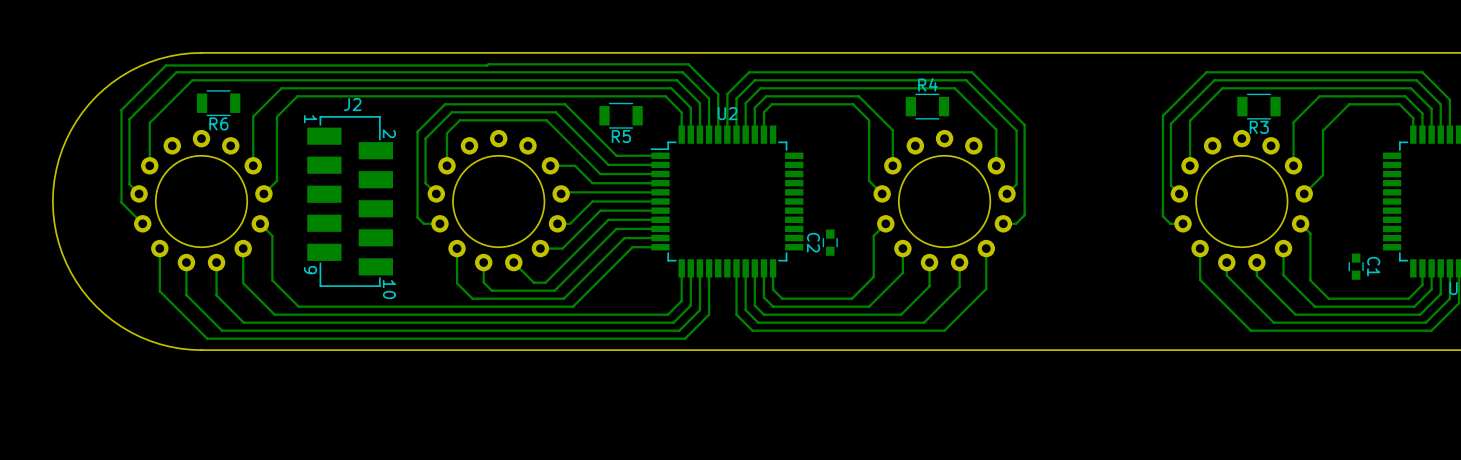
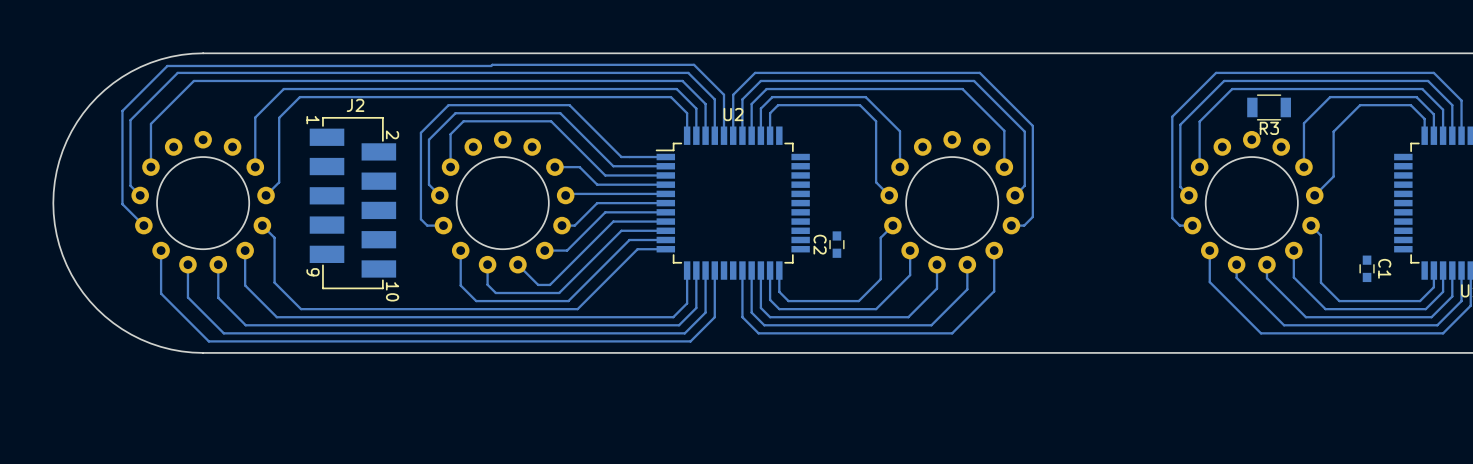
R6: (218, 103) -> none
R4: (927, 106) -> none
R5: (621, 115) -> none

